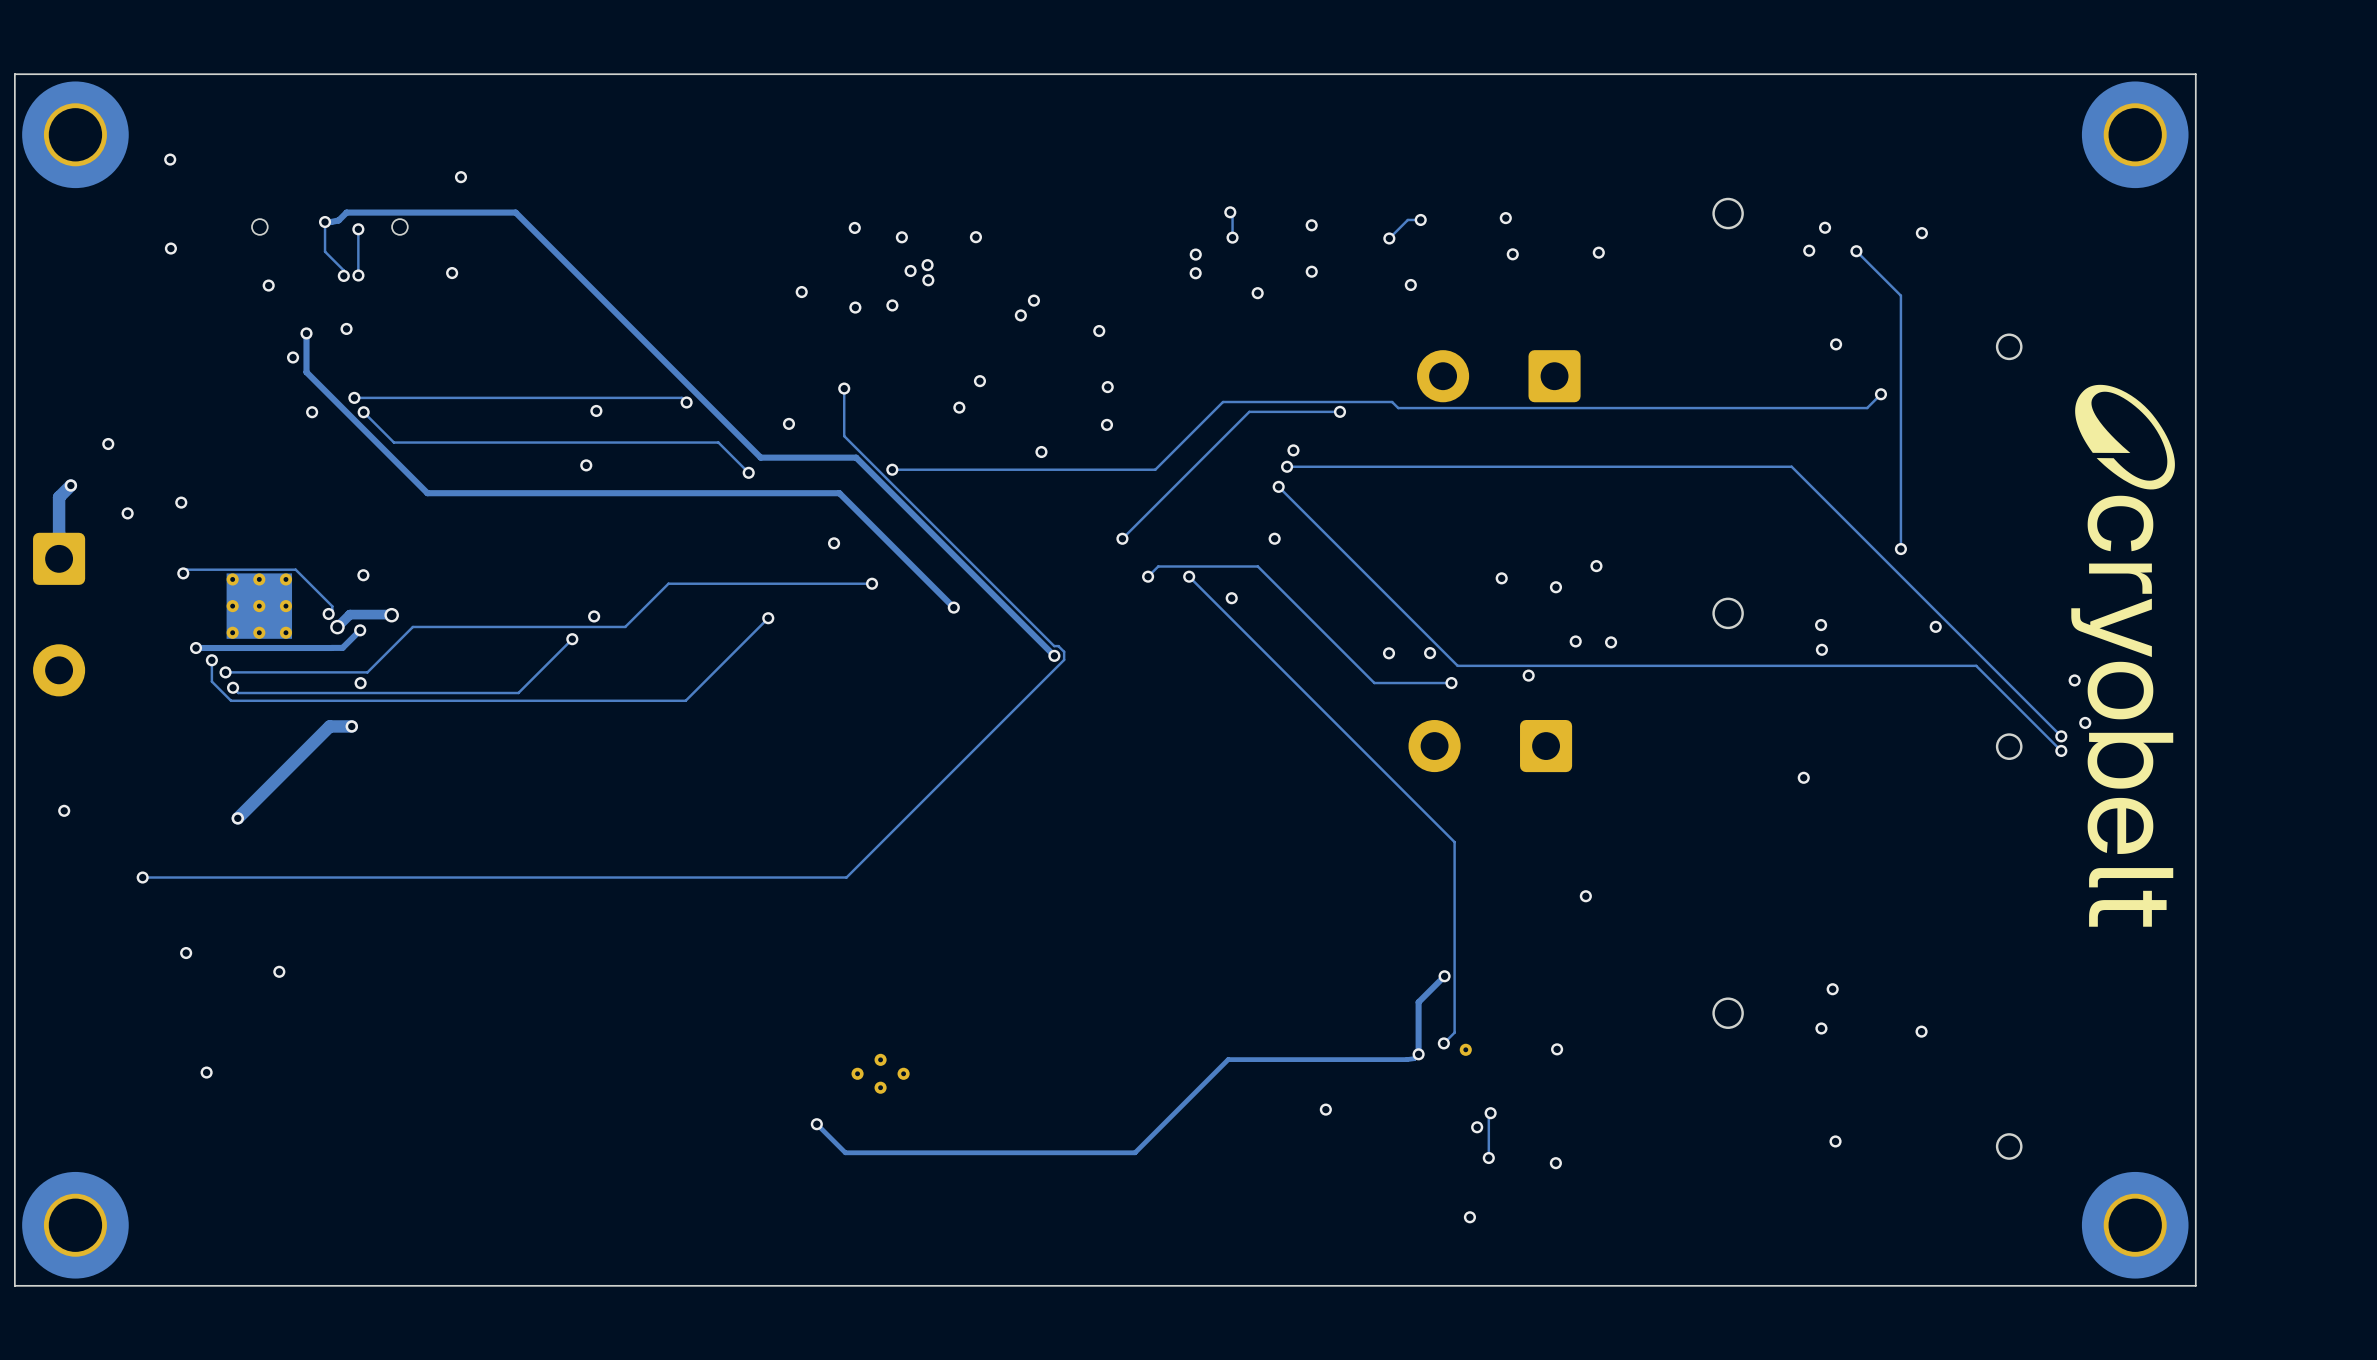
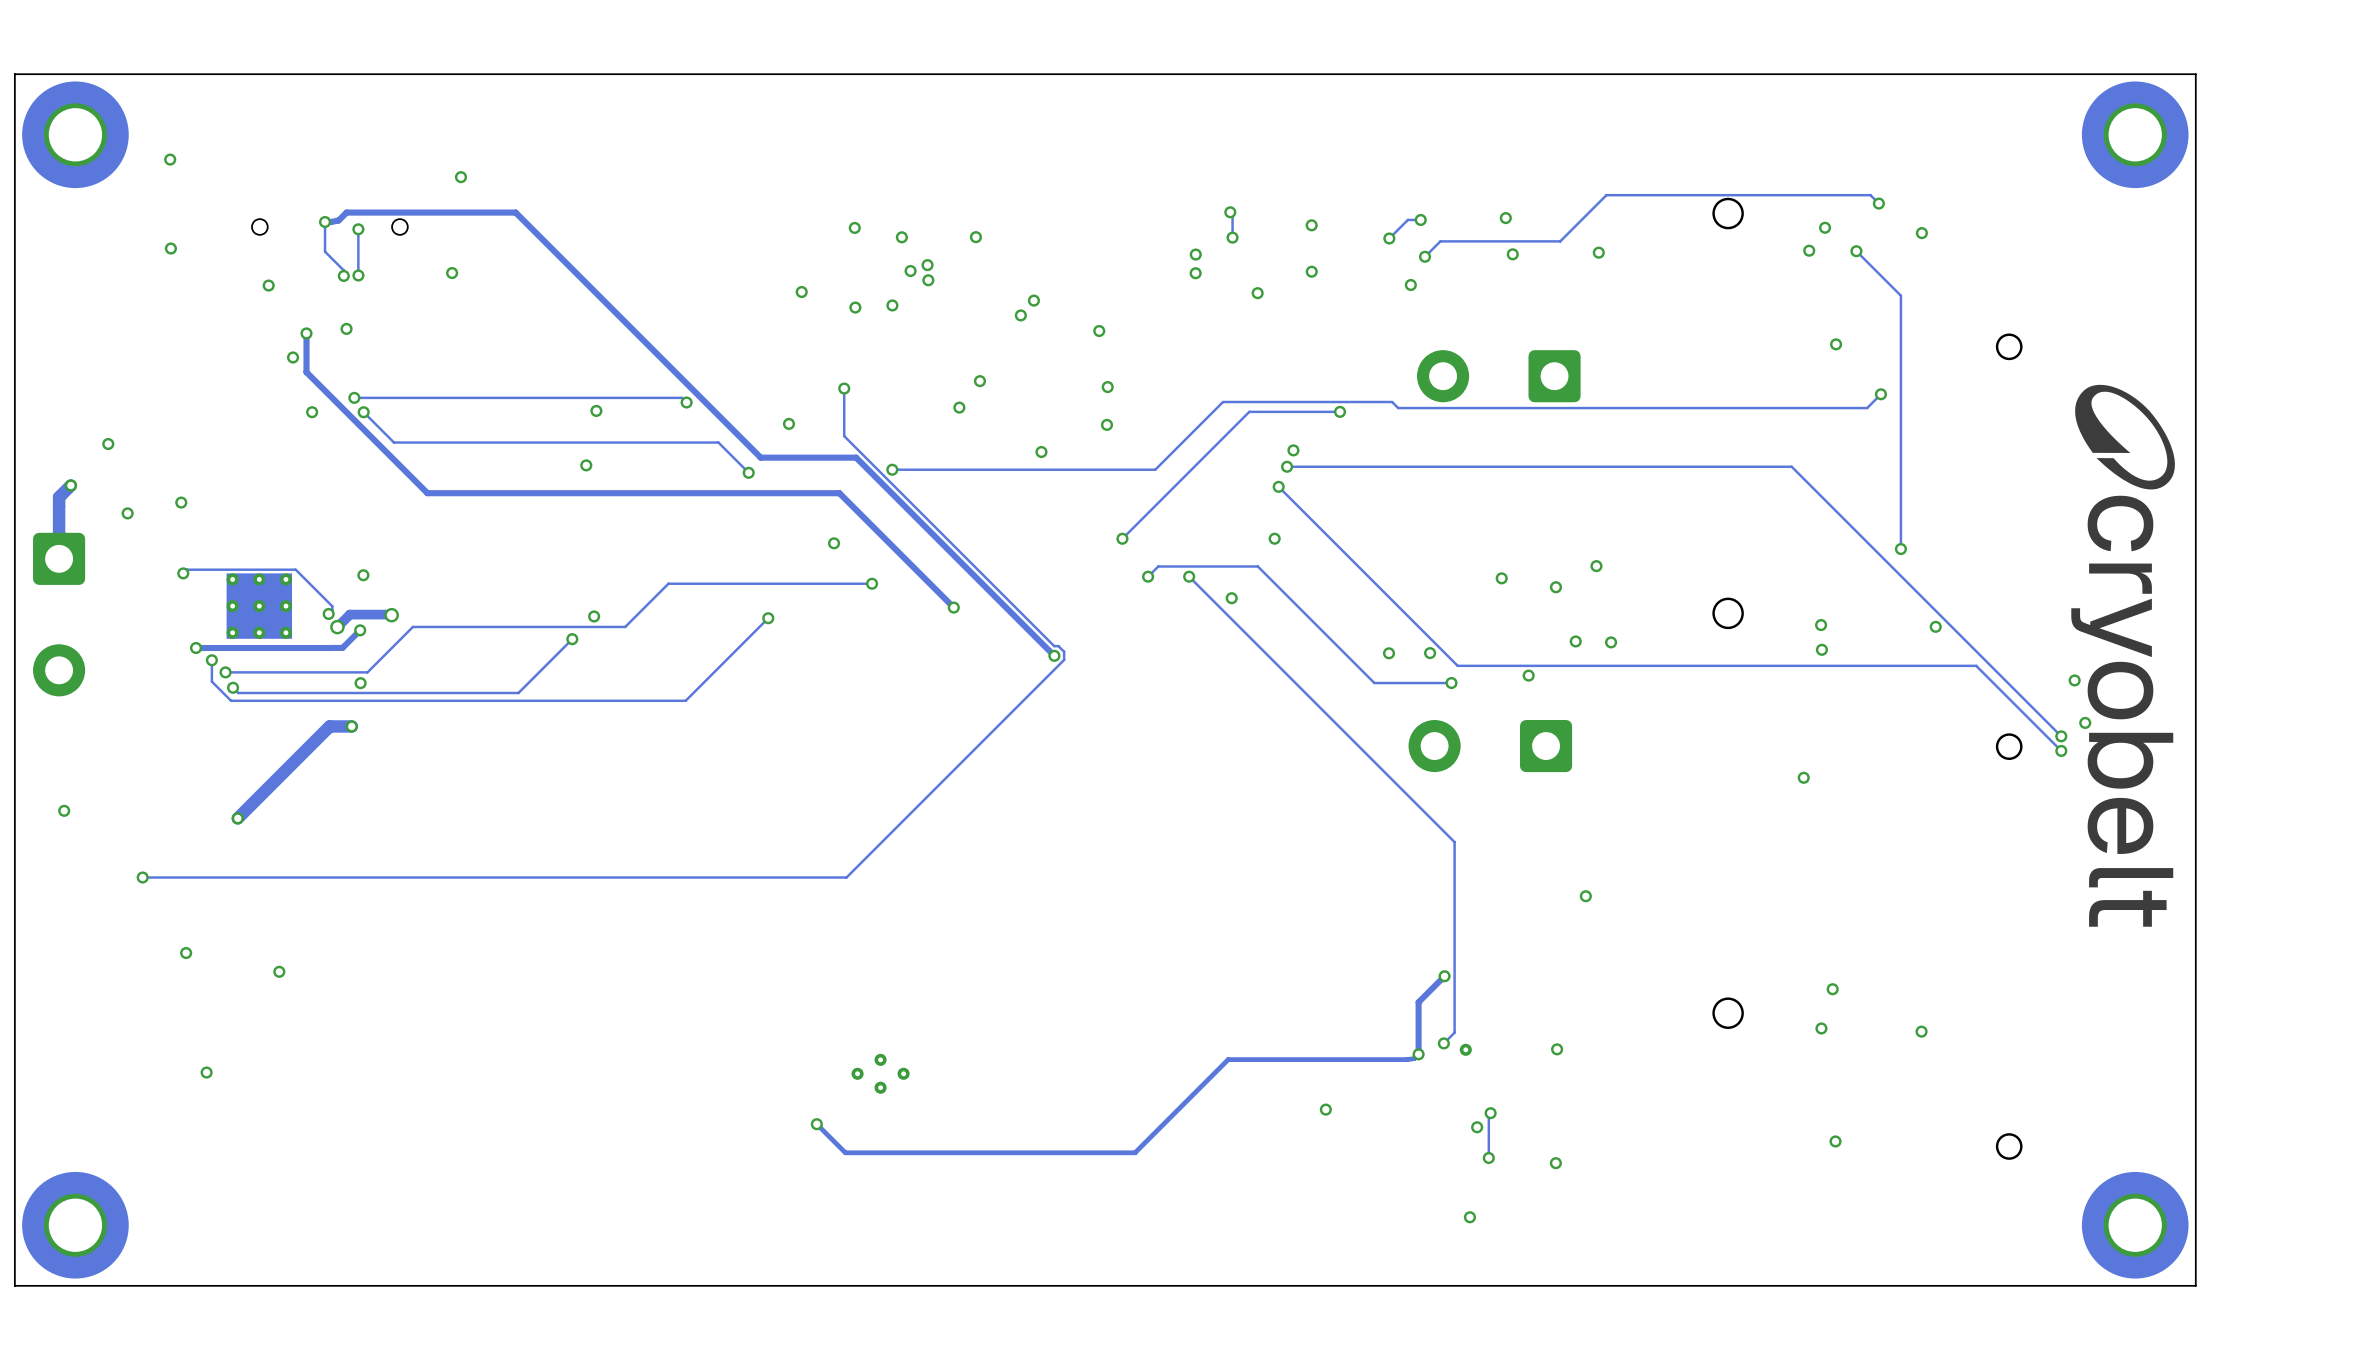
track: none -> (1878, 203) (1870, 195) (1606, 195) (1560, 241) (1440, 241) (1425, 256)
via: none -> (1878, 203)
via: none -> (1425, 256)

